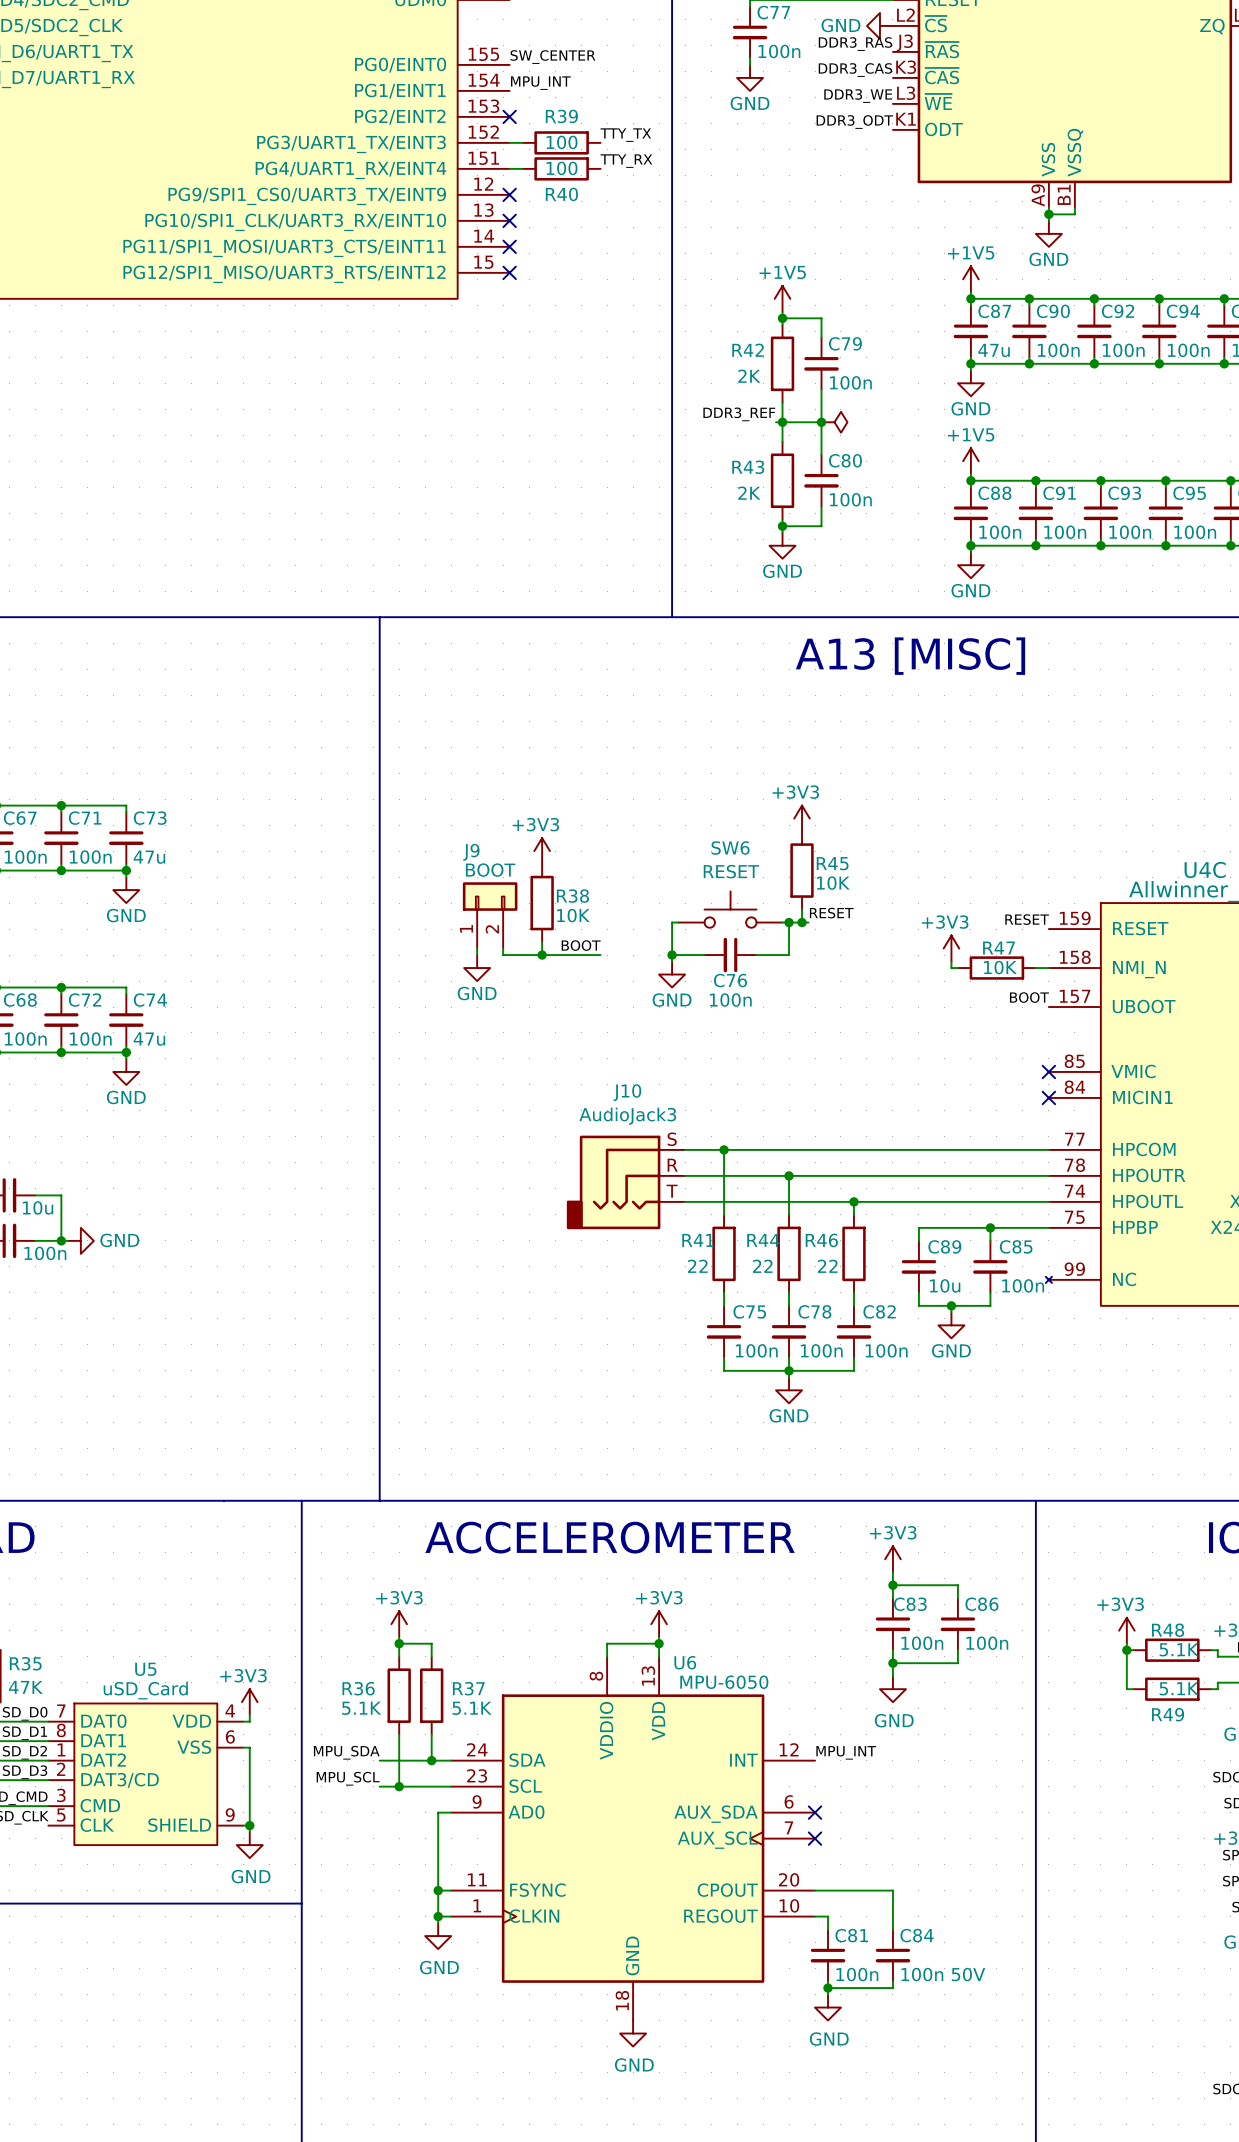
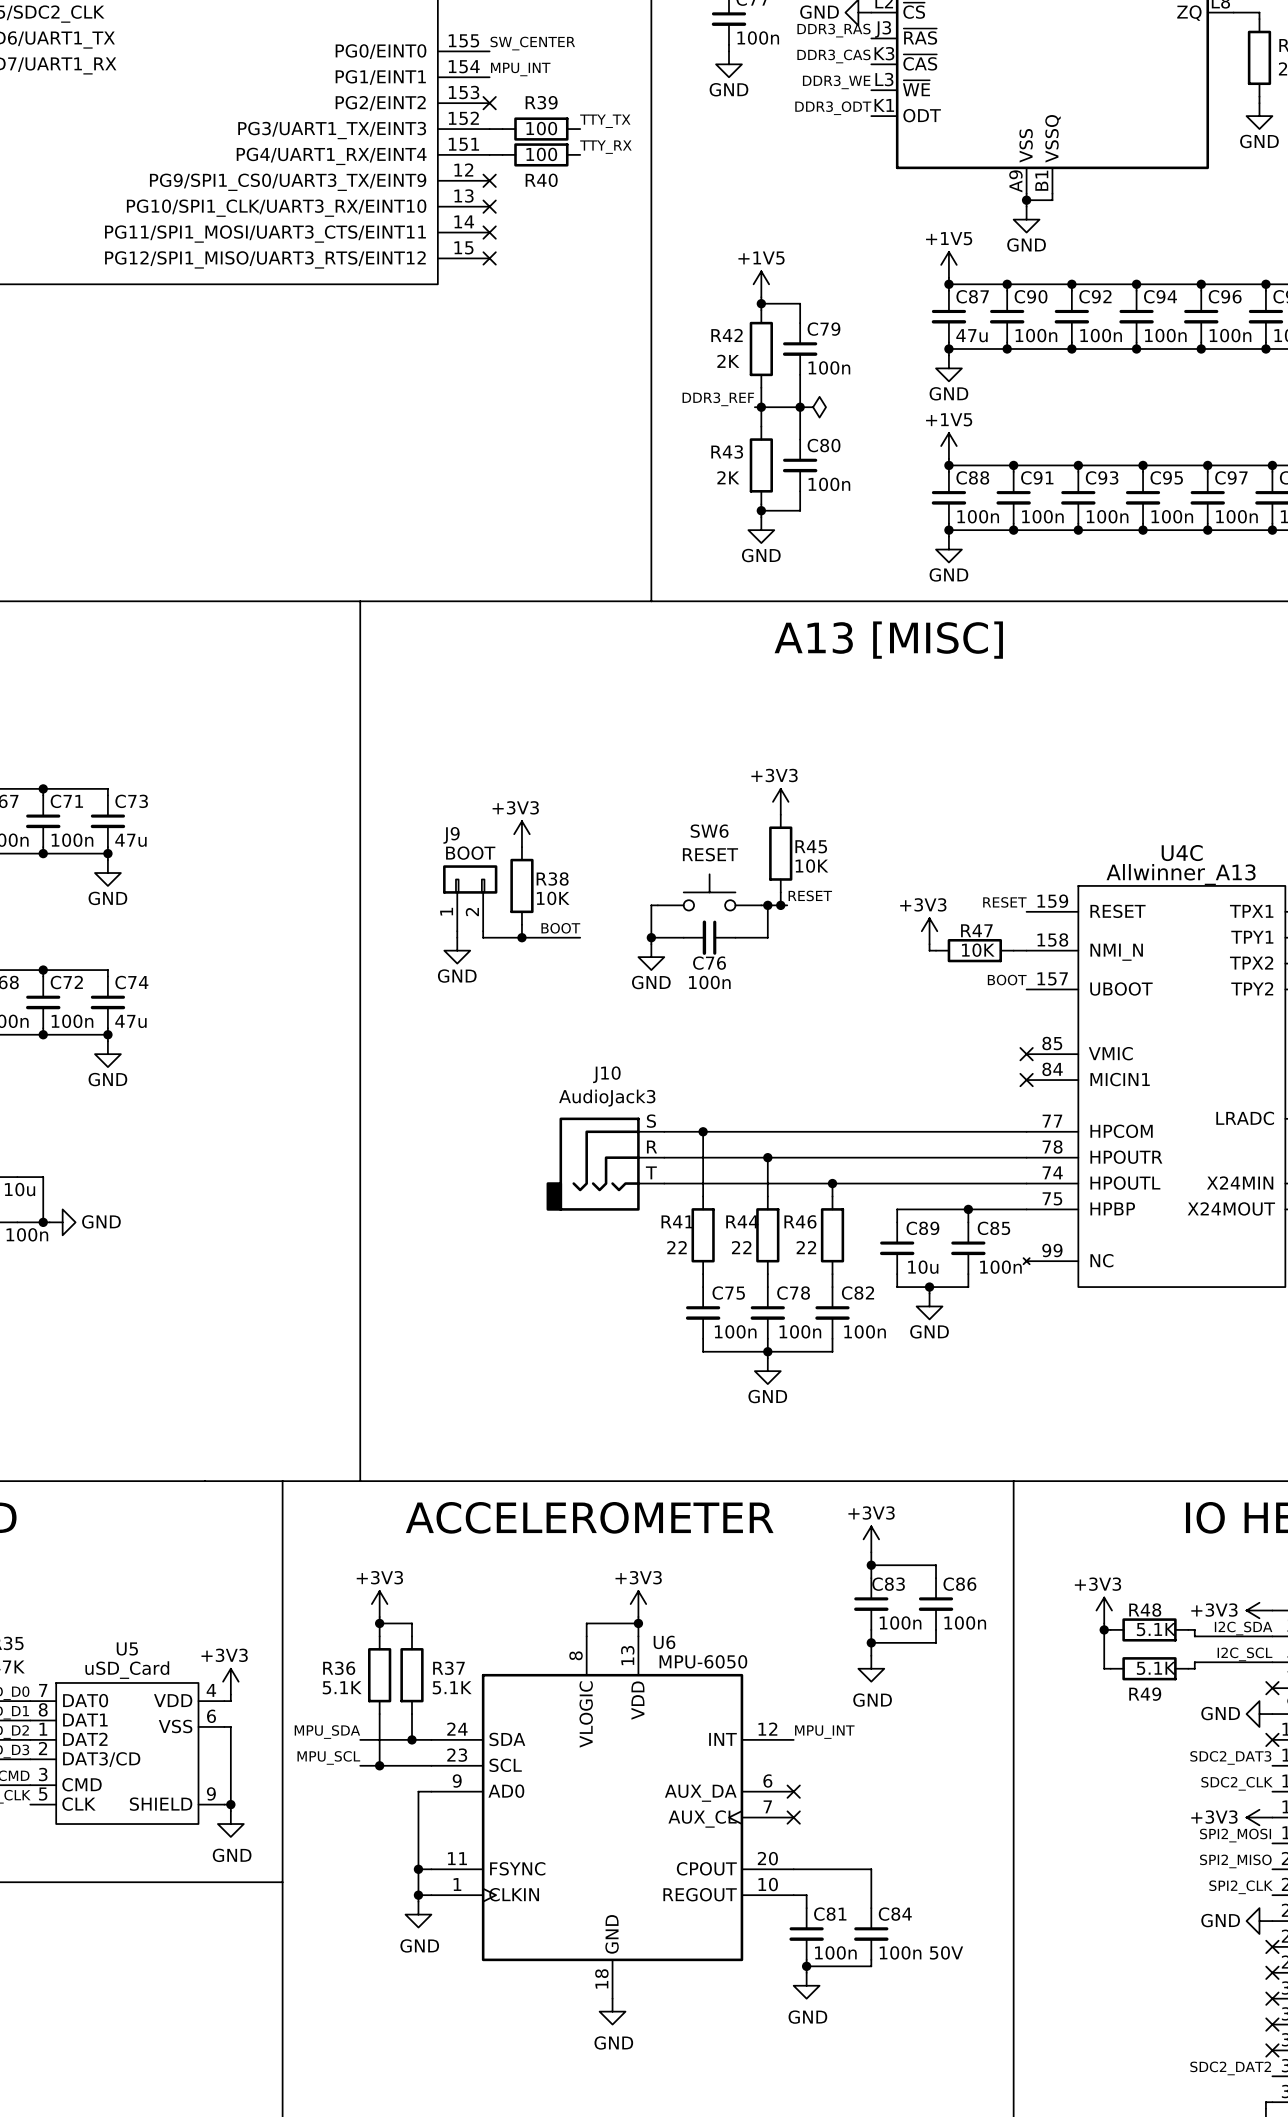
U6 pin name: VDDIO (606, 1730) -> VLOGIC (586, 1714)
U6 pin name: AUX_SDA (716, 1814) -> AUX_DA (700, 1793)
U6 pin name: AUX_SCL (717, 1840) -> AUX_CL (702, 1819)

